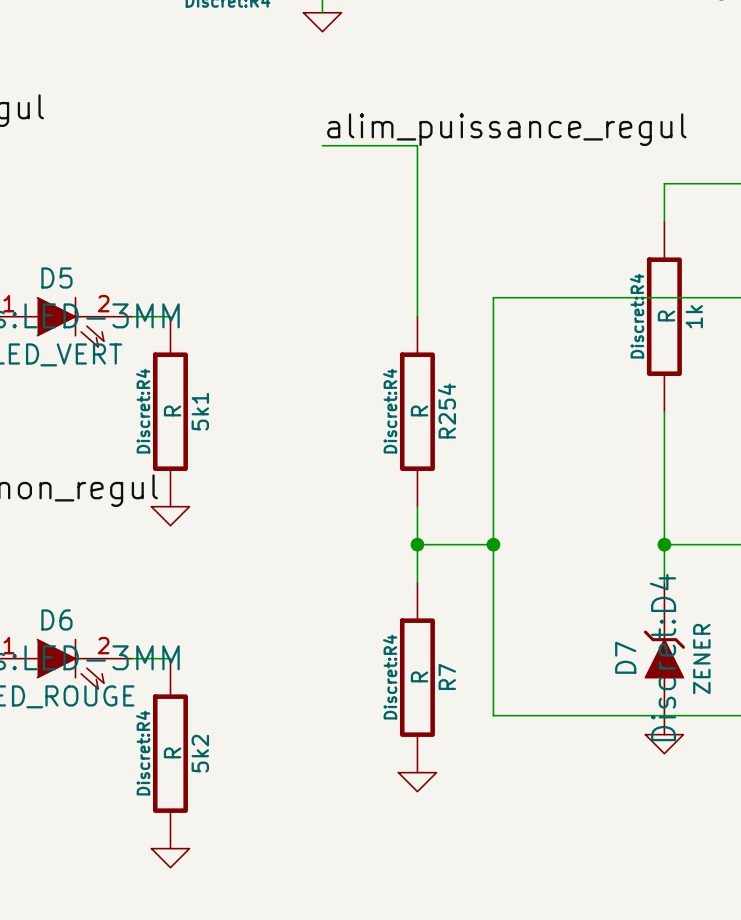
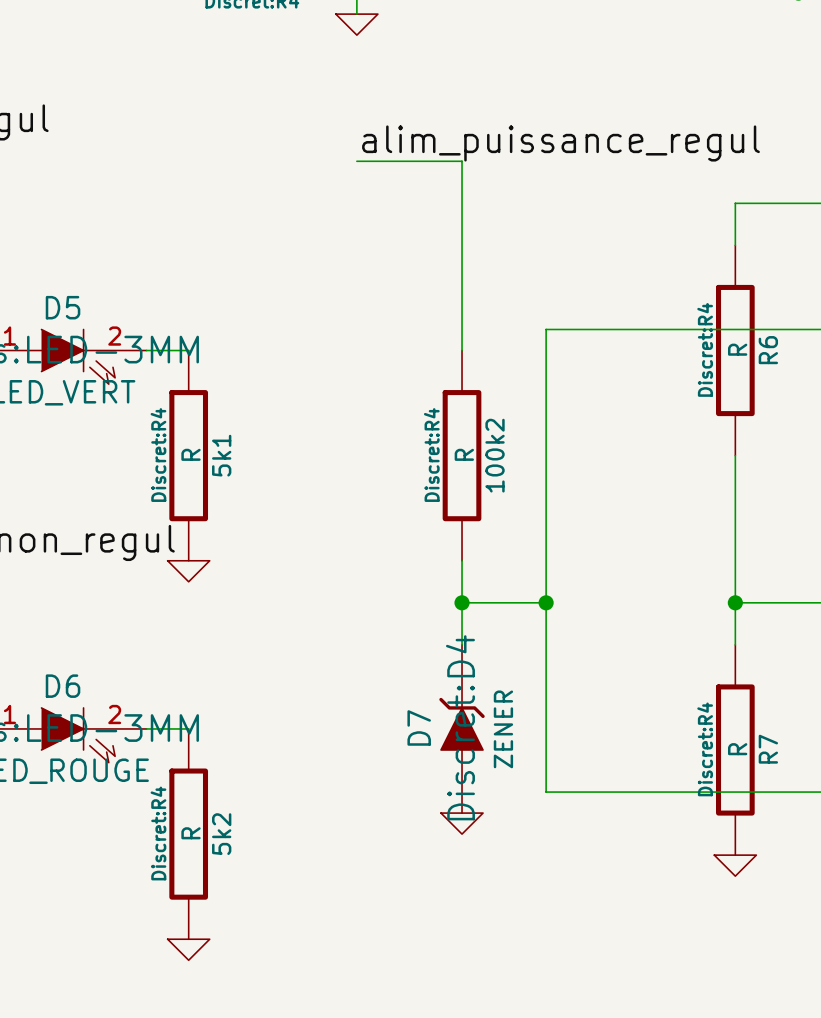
1k name: 1k (694, 316) -> R6 (768, 350)
R254 name: R254 (446, 410) -> 100k2 (495, 455)
D7 position: (664, 658) -> (462, 728)
R7 position: (417, 677) -> (735, 750)
power symbol position: (664, 744) -> (735, 865)
power symbol position: (417, 782) -> (462, 823)

